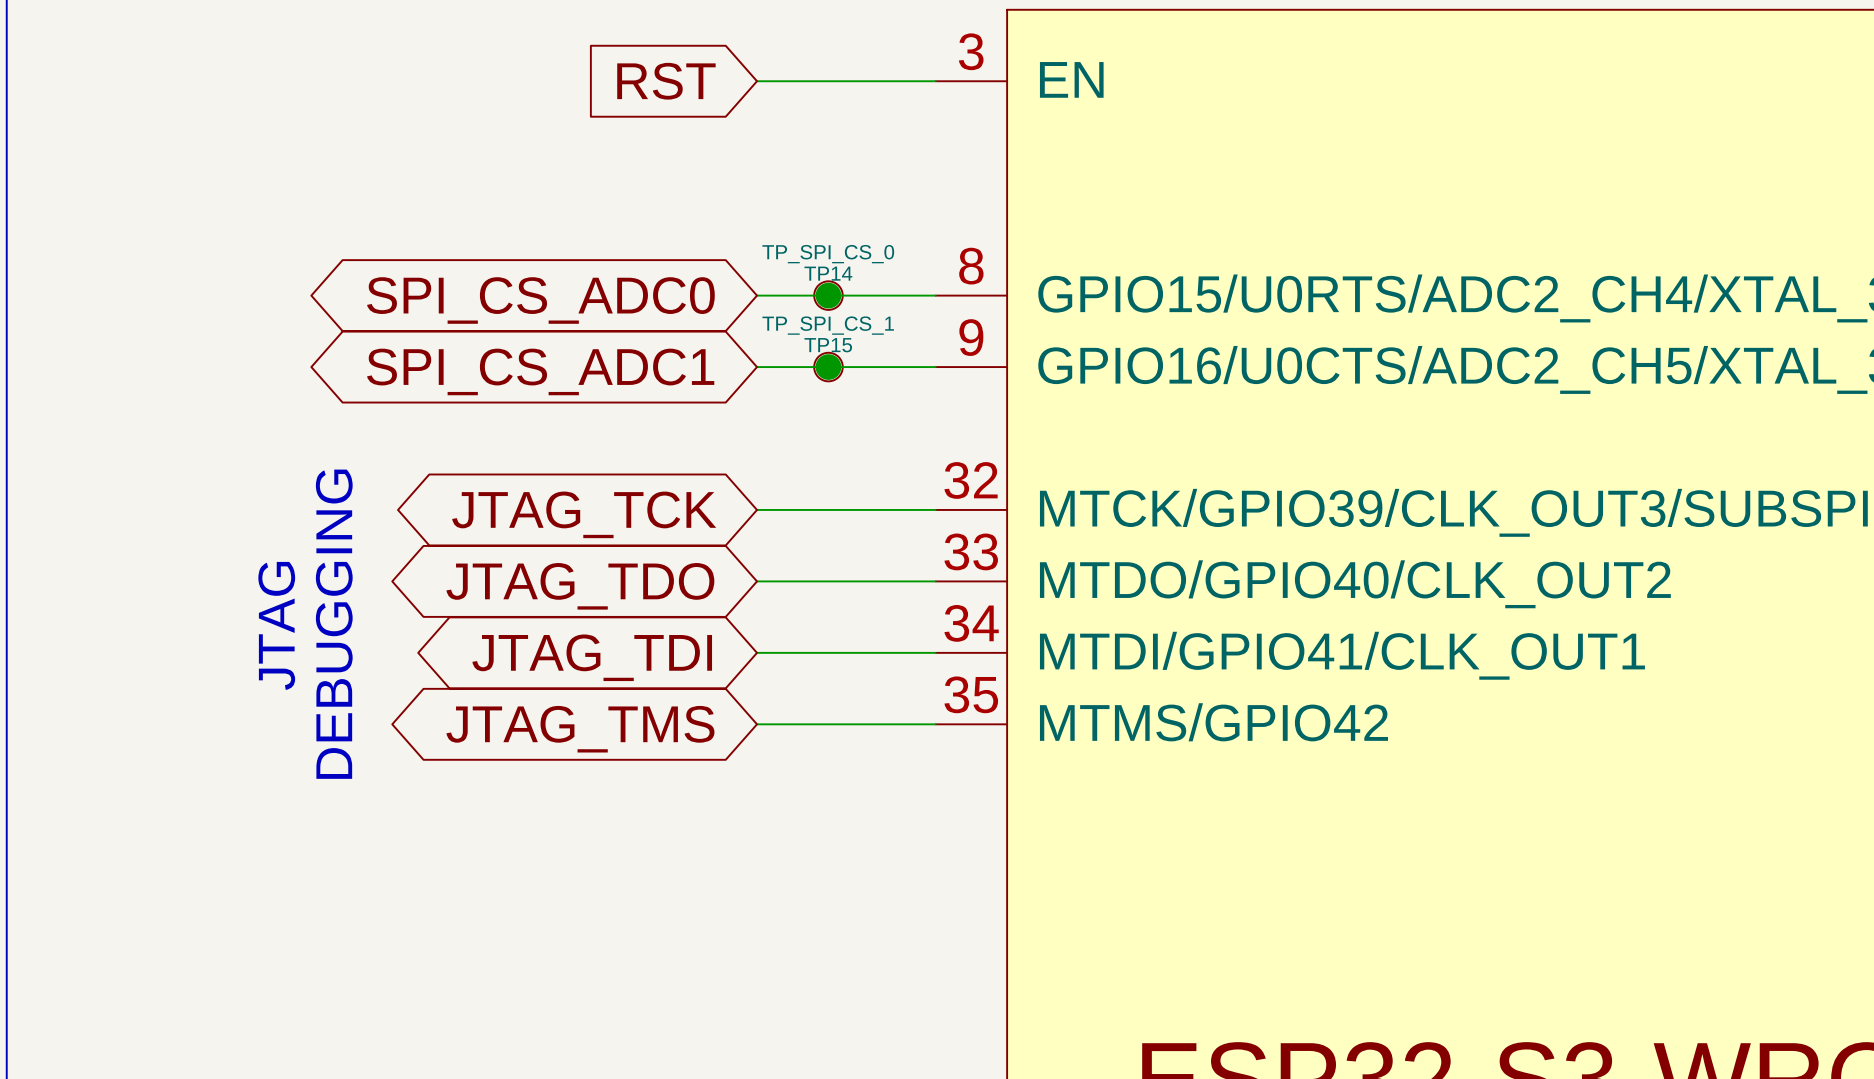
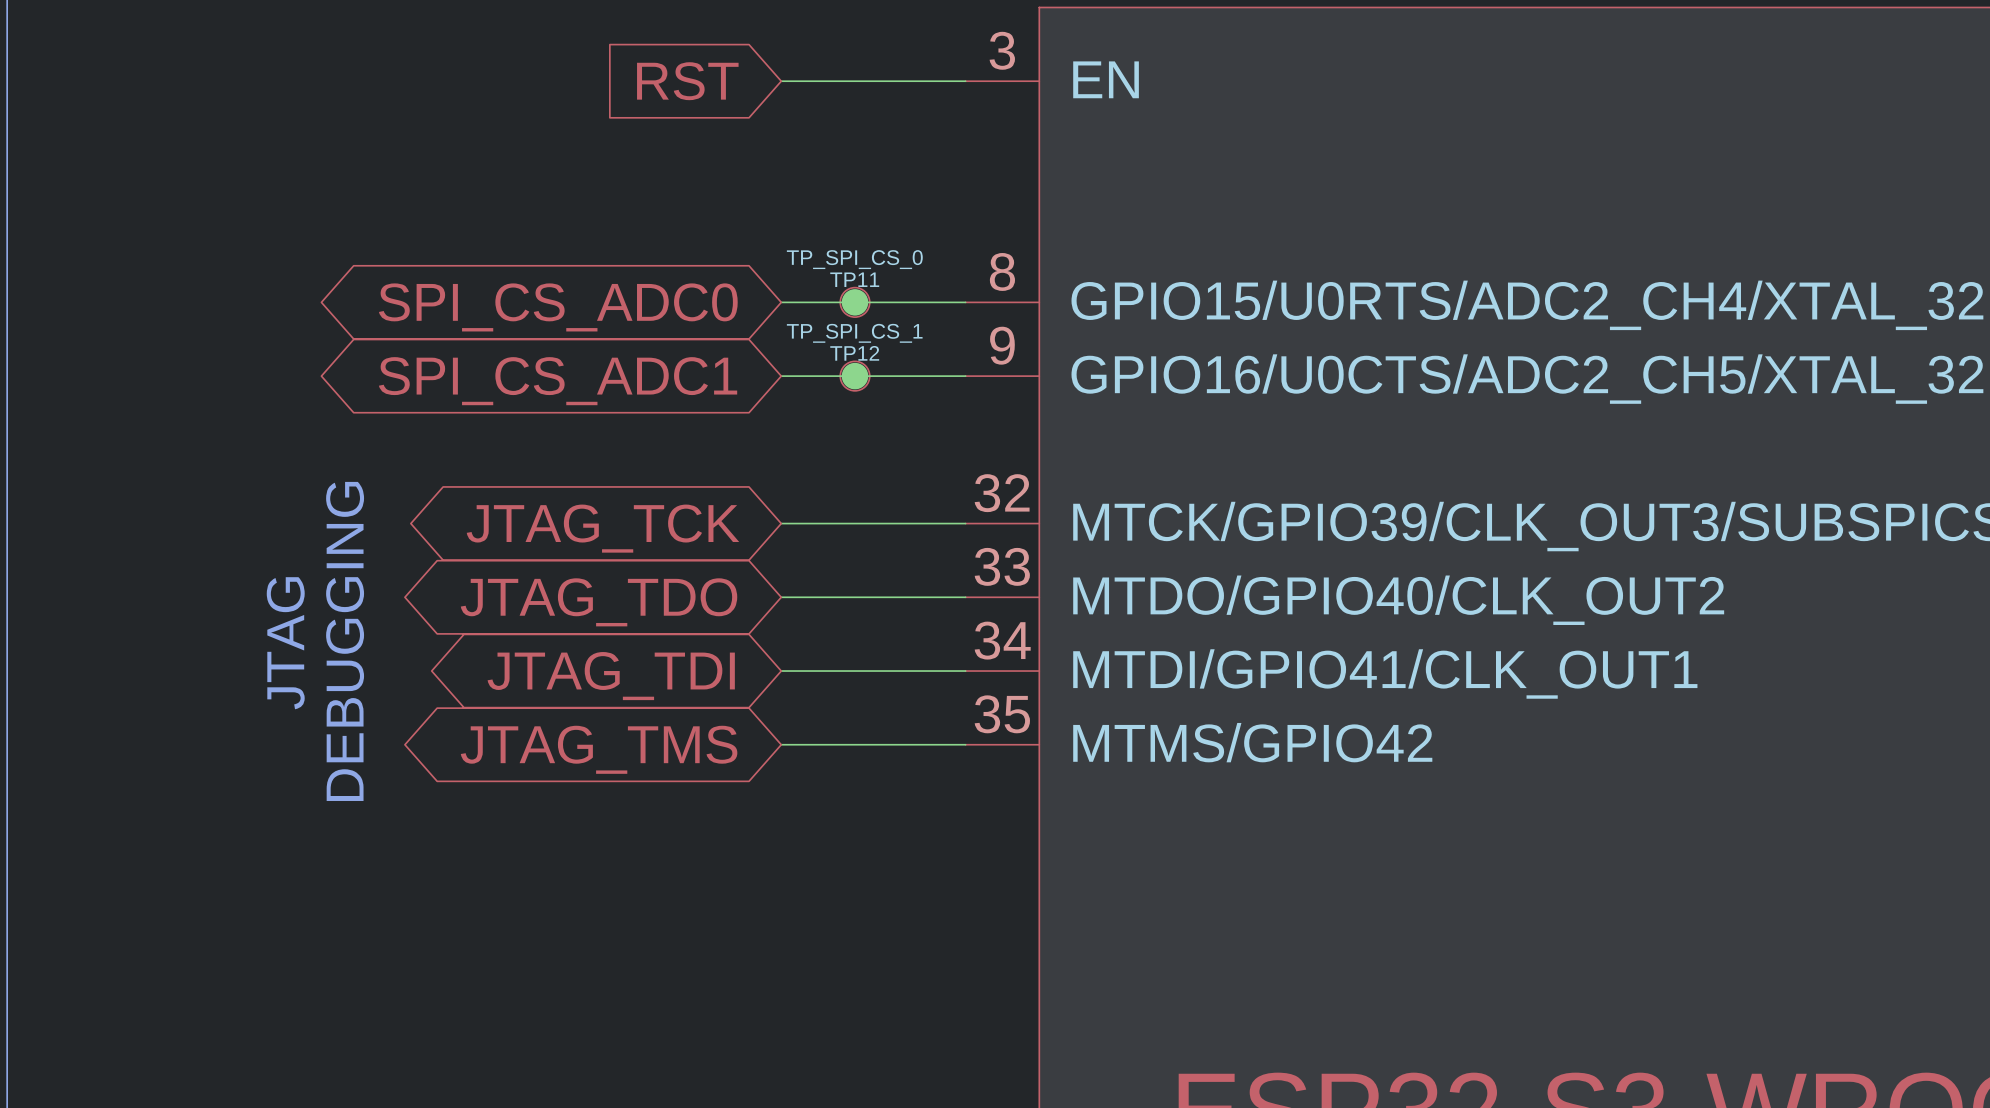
TP14 name: TP14 (828, 273) -> TP11 (854, 279)
TP15 name: TP15 (828, 345) -> TP12 (854, 353)

